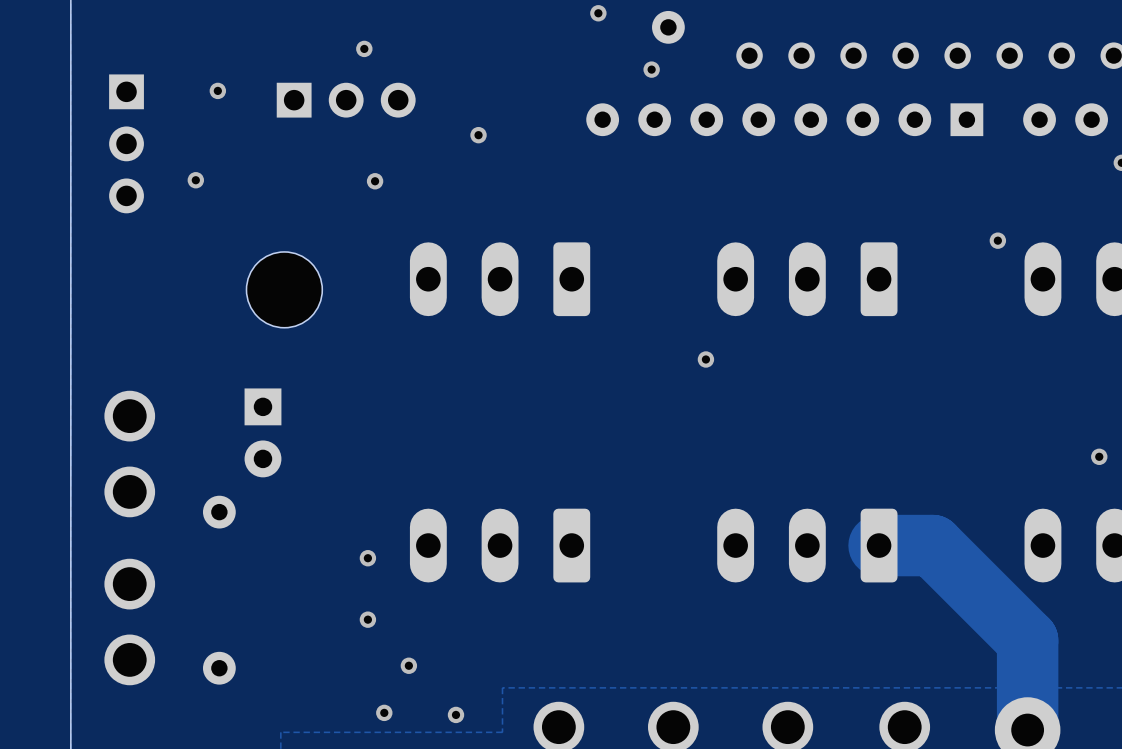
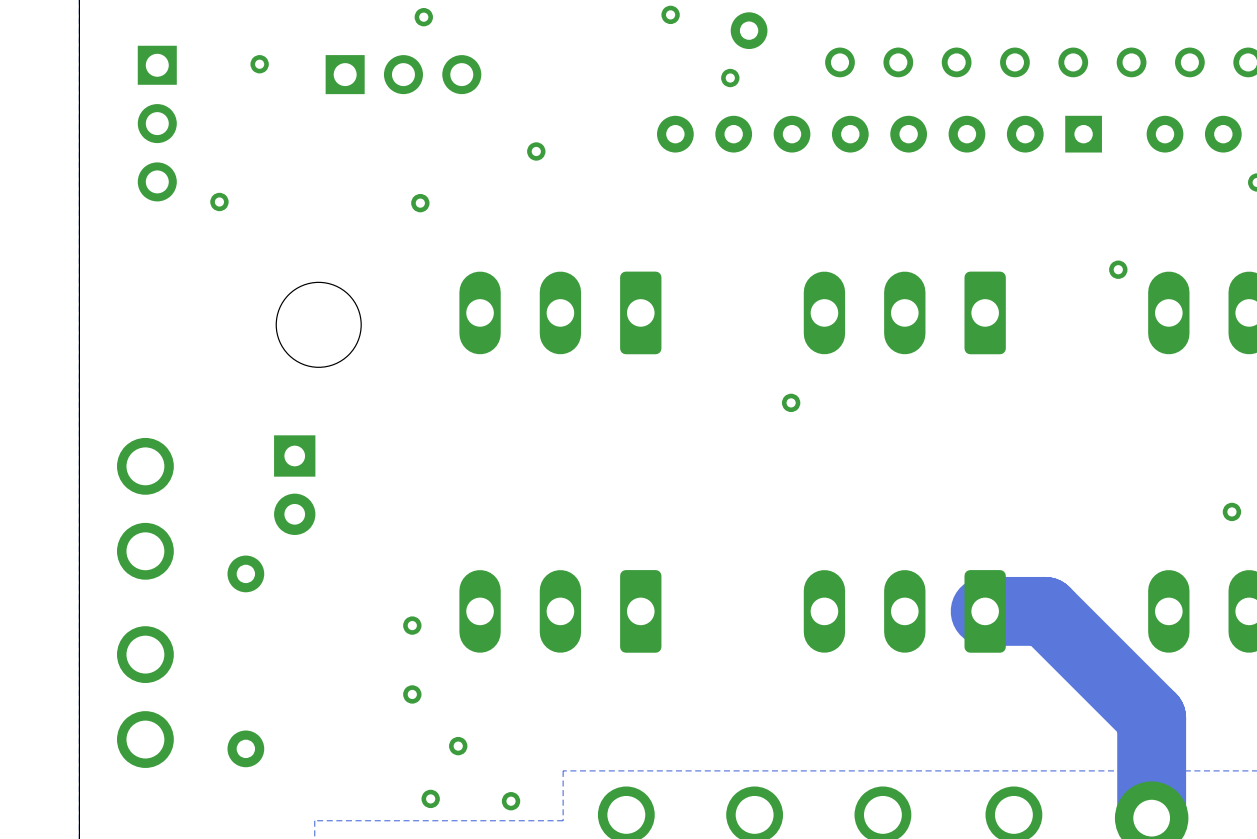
via position: (364, 48) -> (423, 17)
via position: (217, 90) -> (259, 64)
part position: (346, 100) -> (403, 74)
part position: (126, 143) -> (157, 123)

